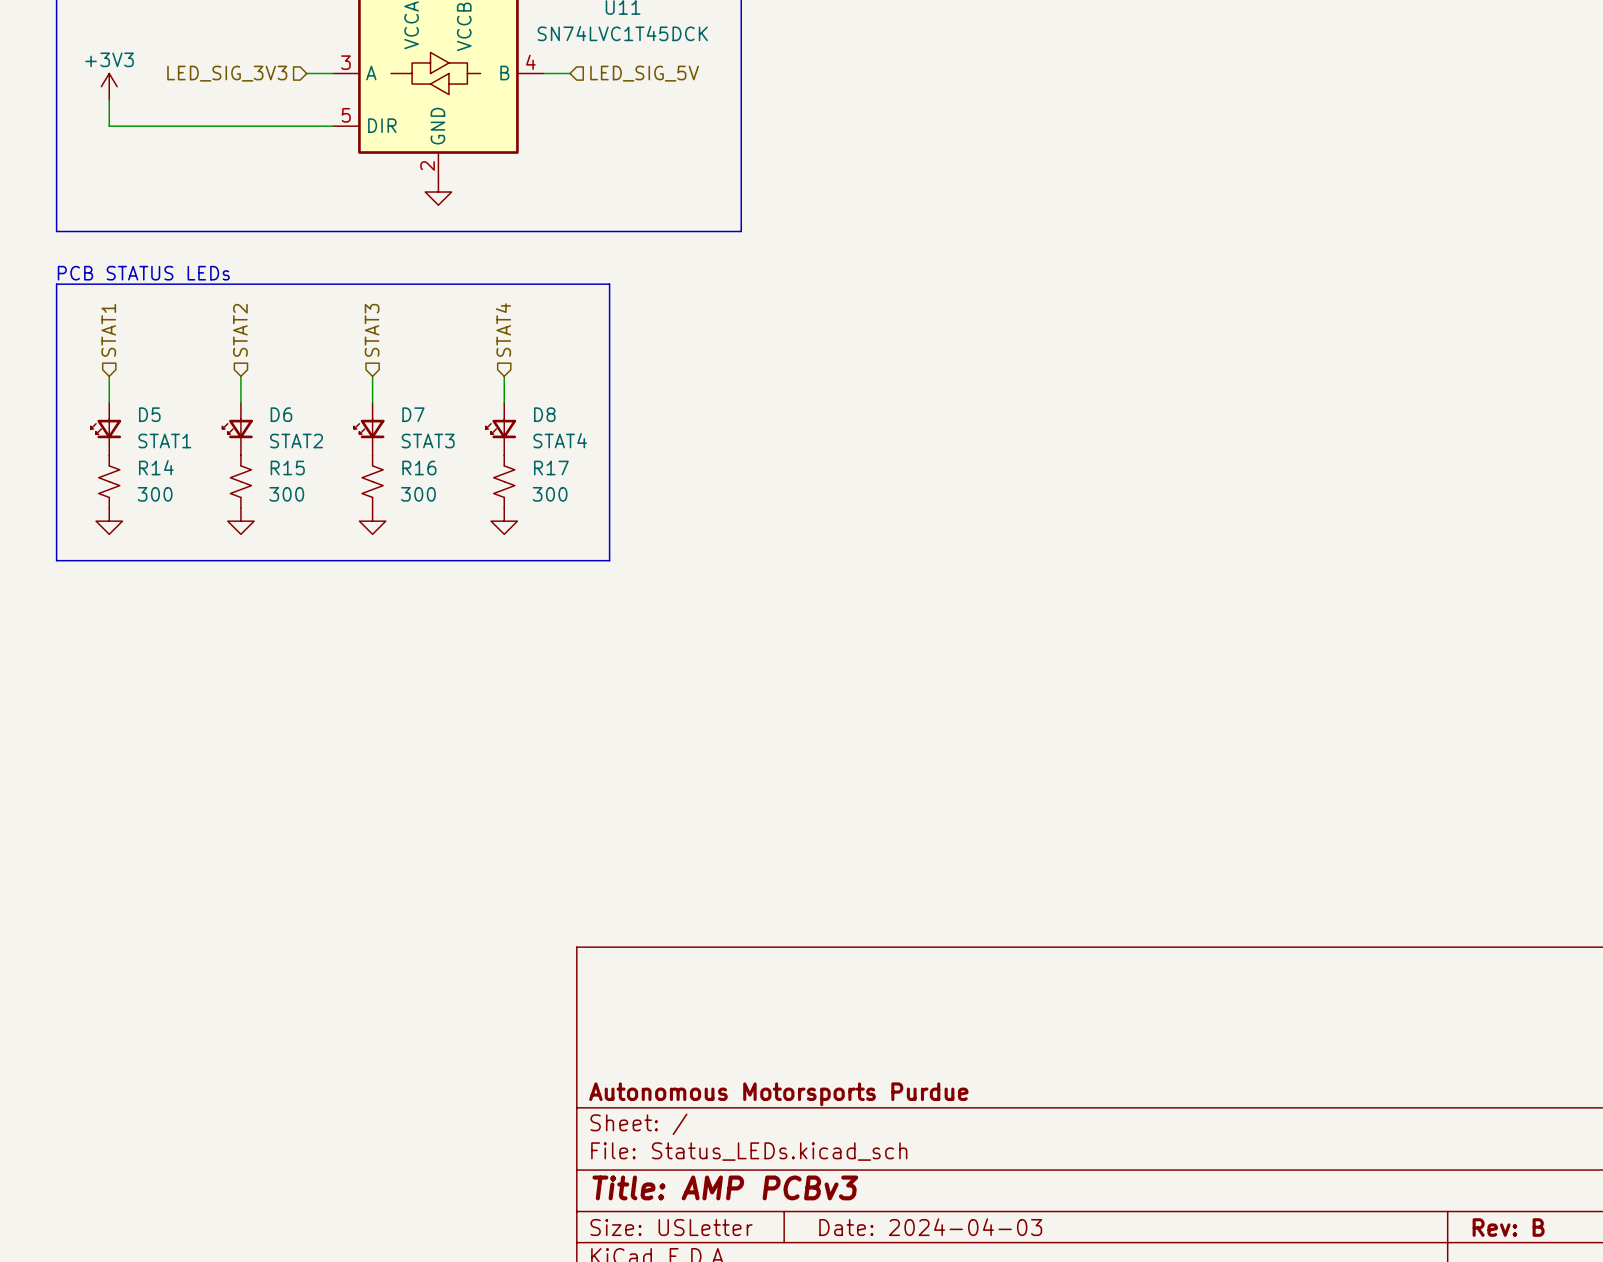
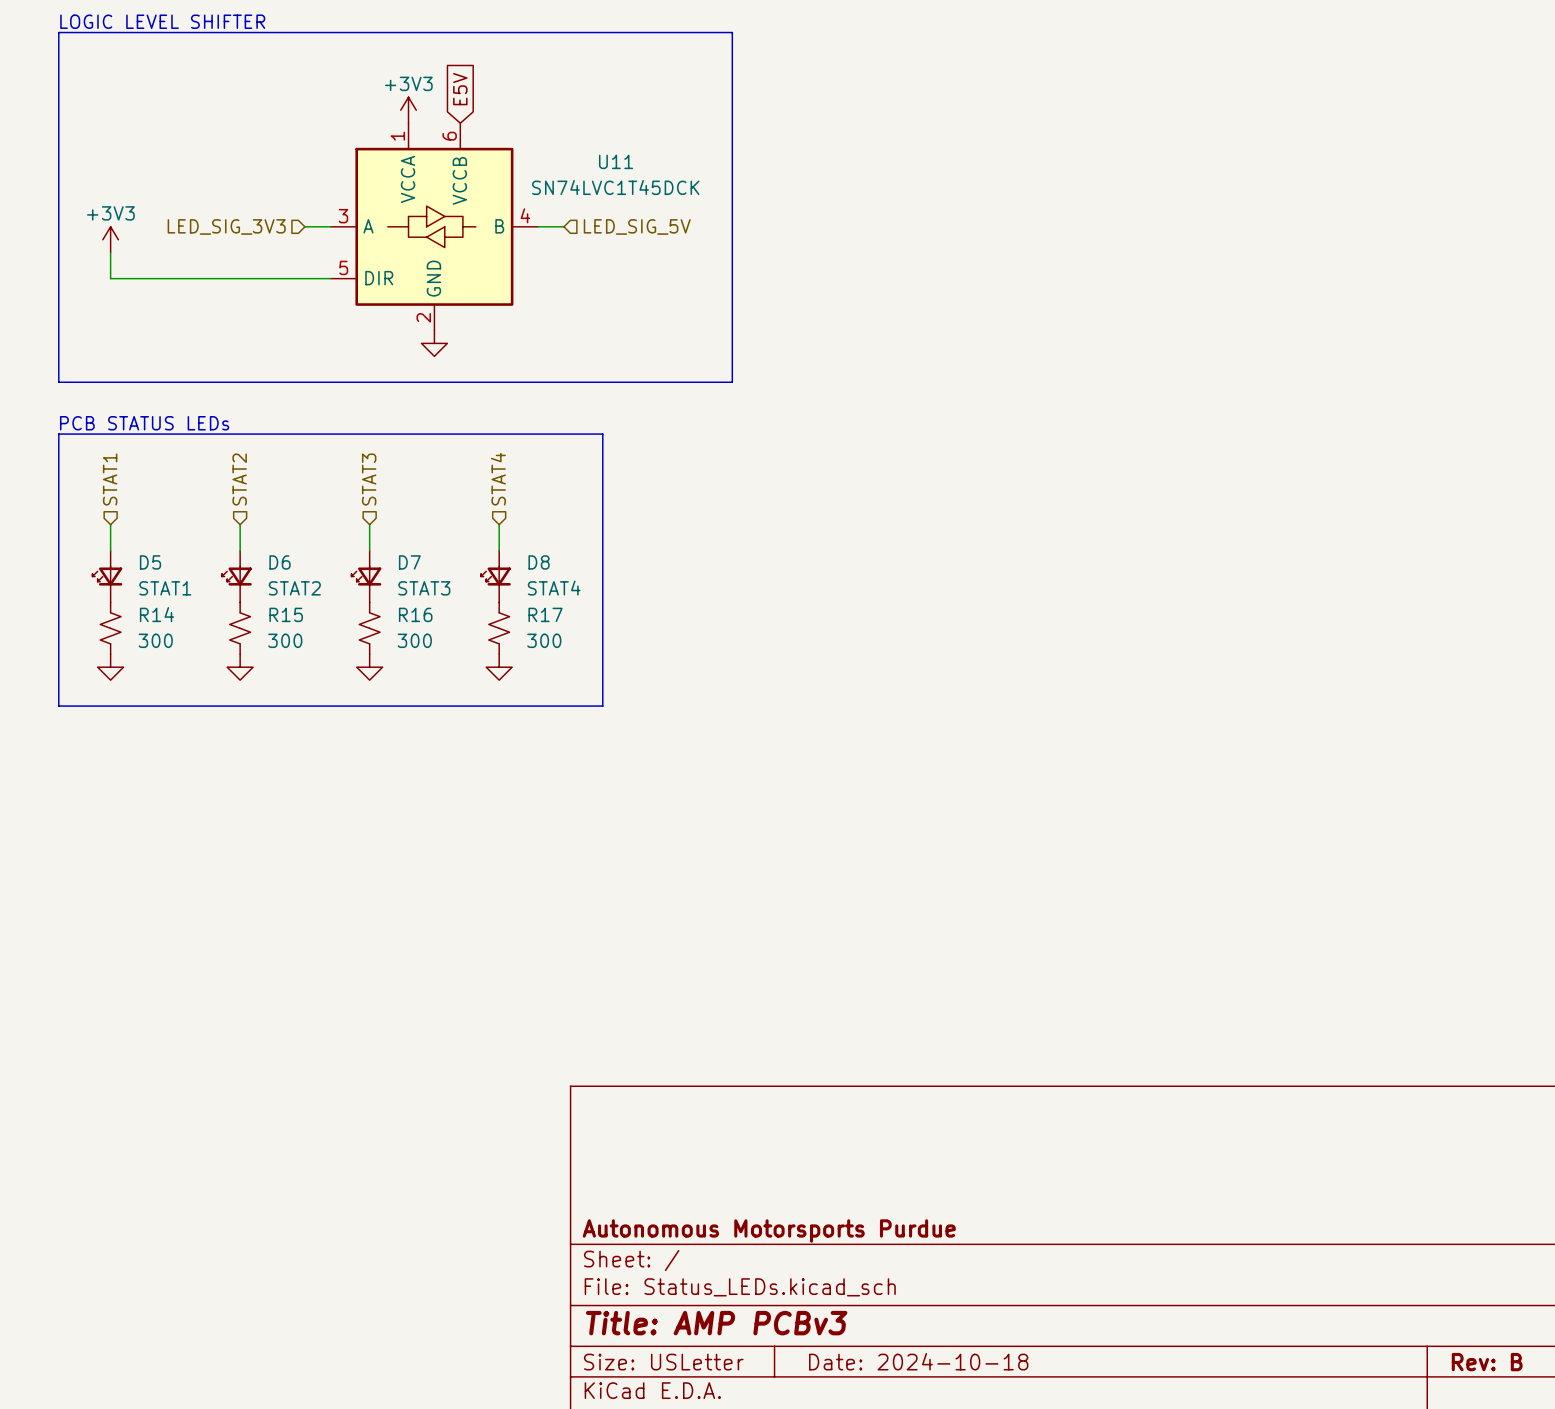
title block: Date: 2024-04-03 (930, 1227) -> Date: 2024-10-18 (918, 1361)

